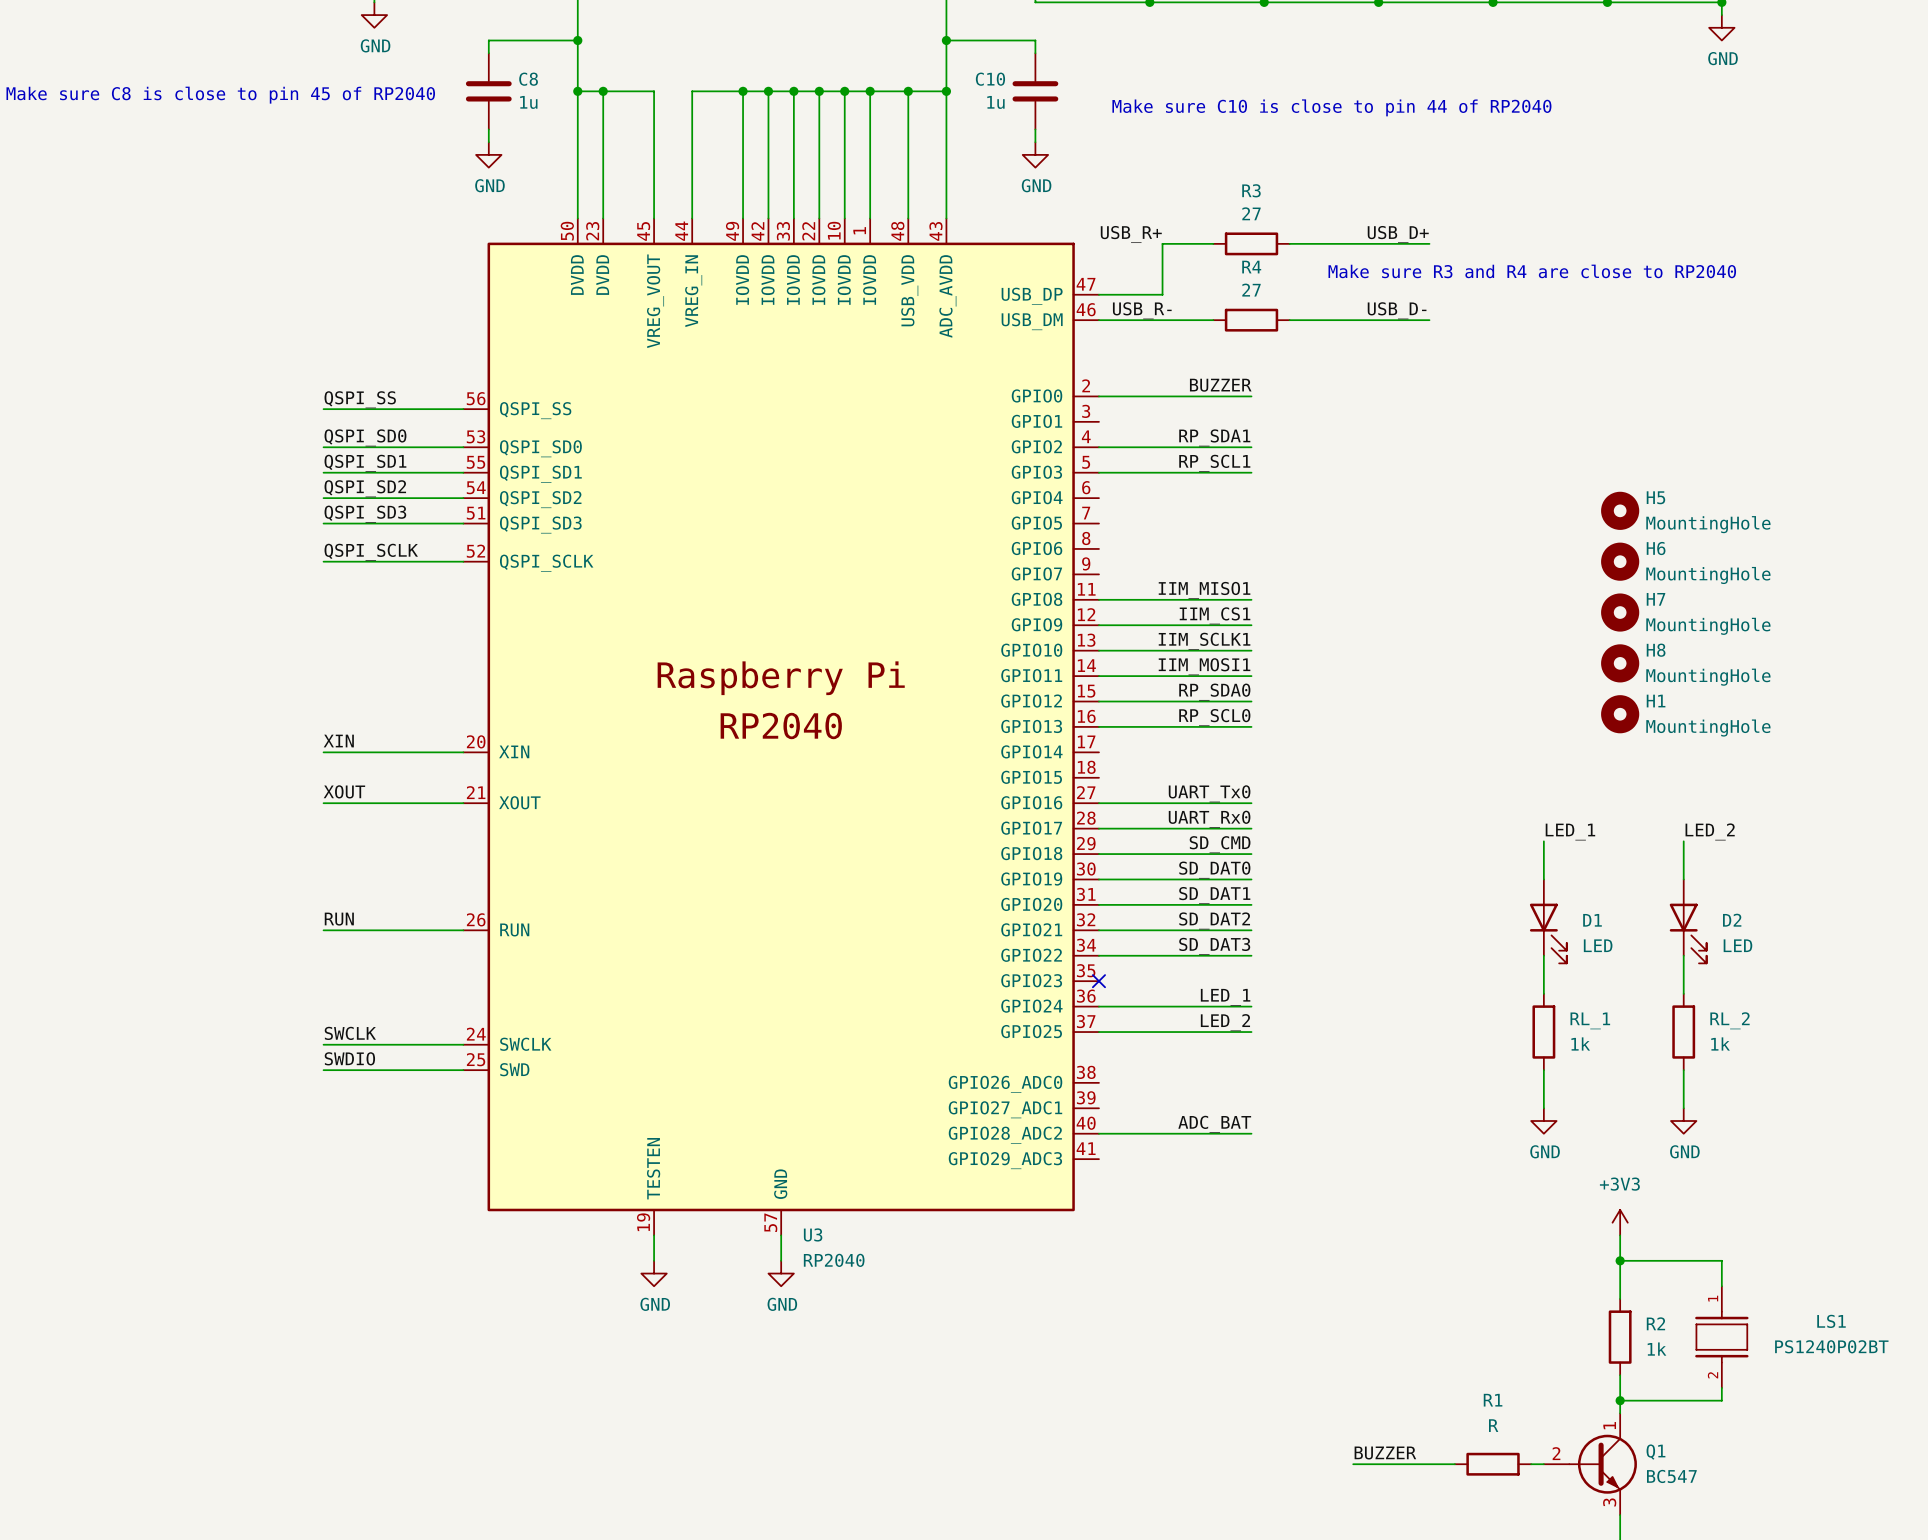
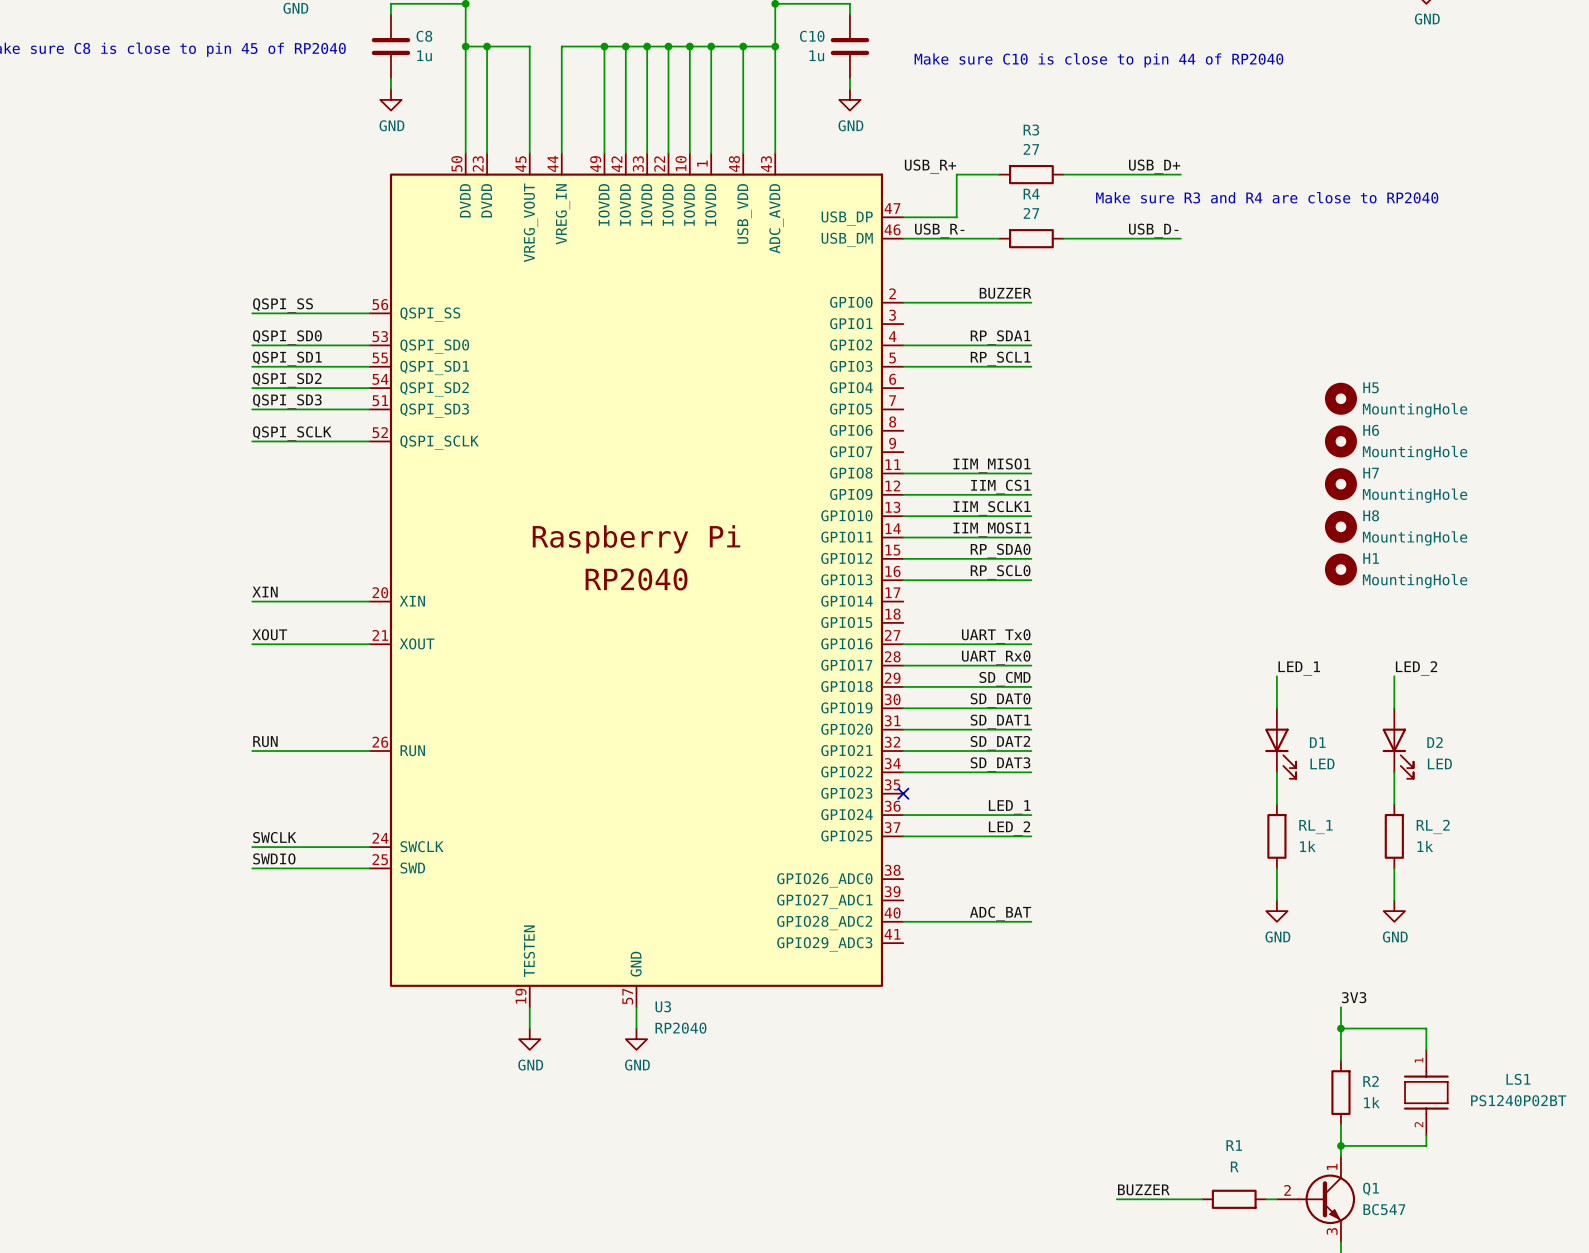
power symbol: +3V3 (1620, 1222) -> none
label: none -> 3V3 (1354, 997)

